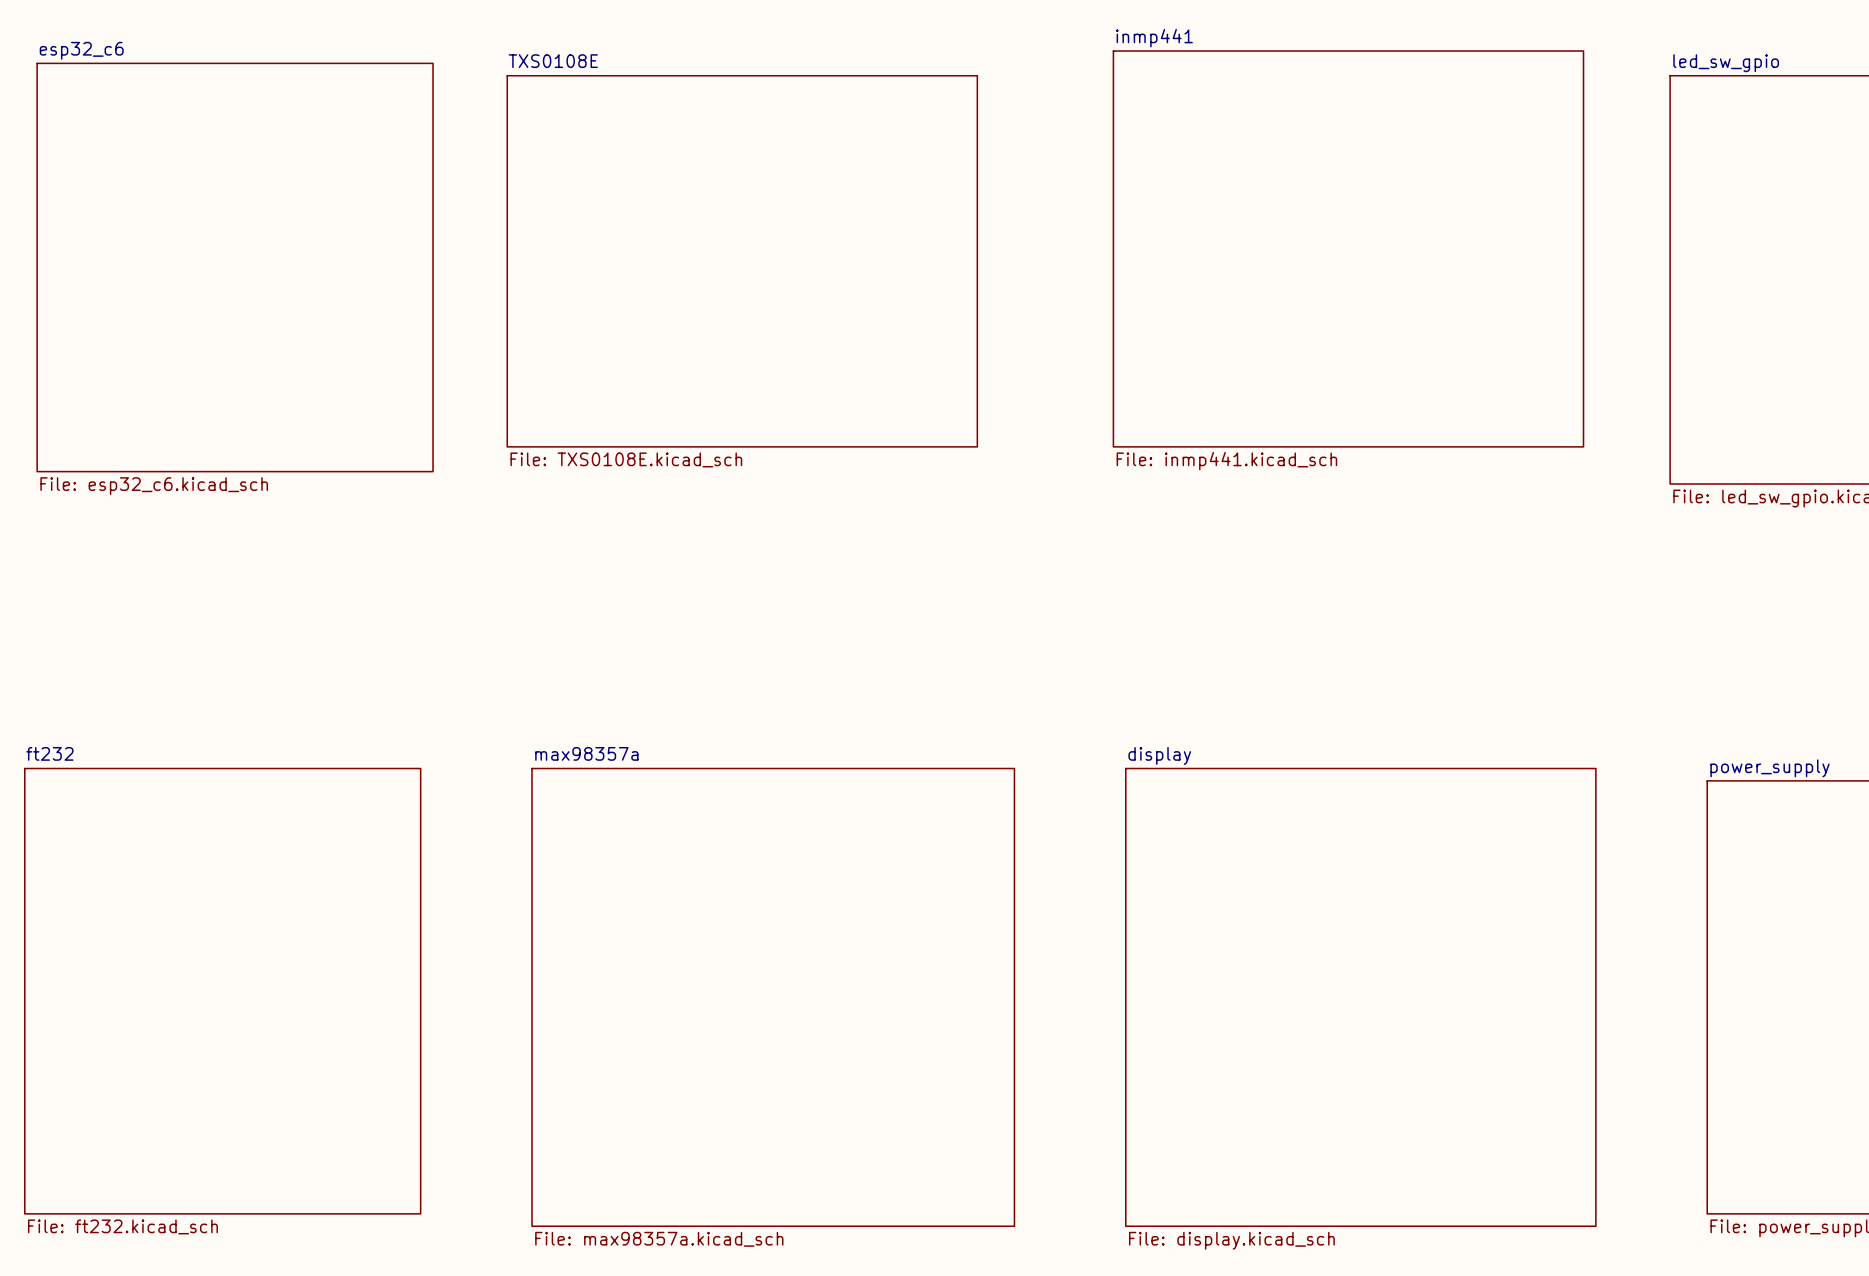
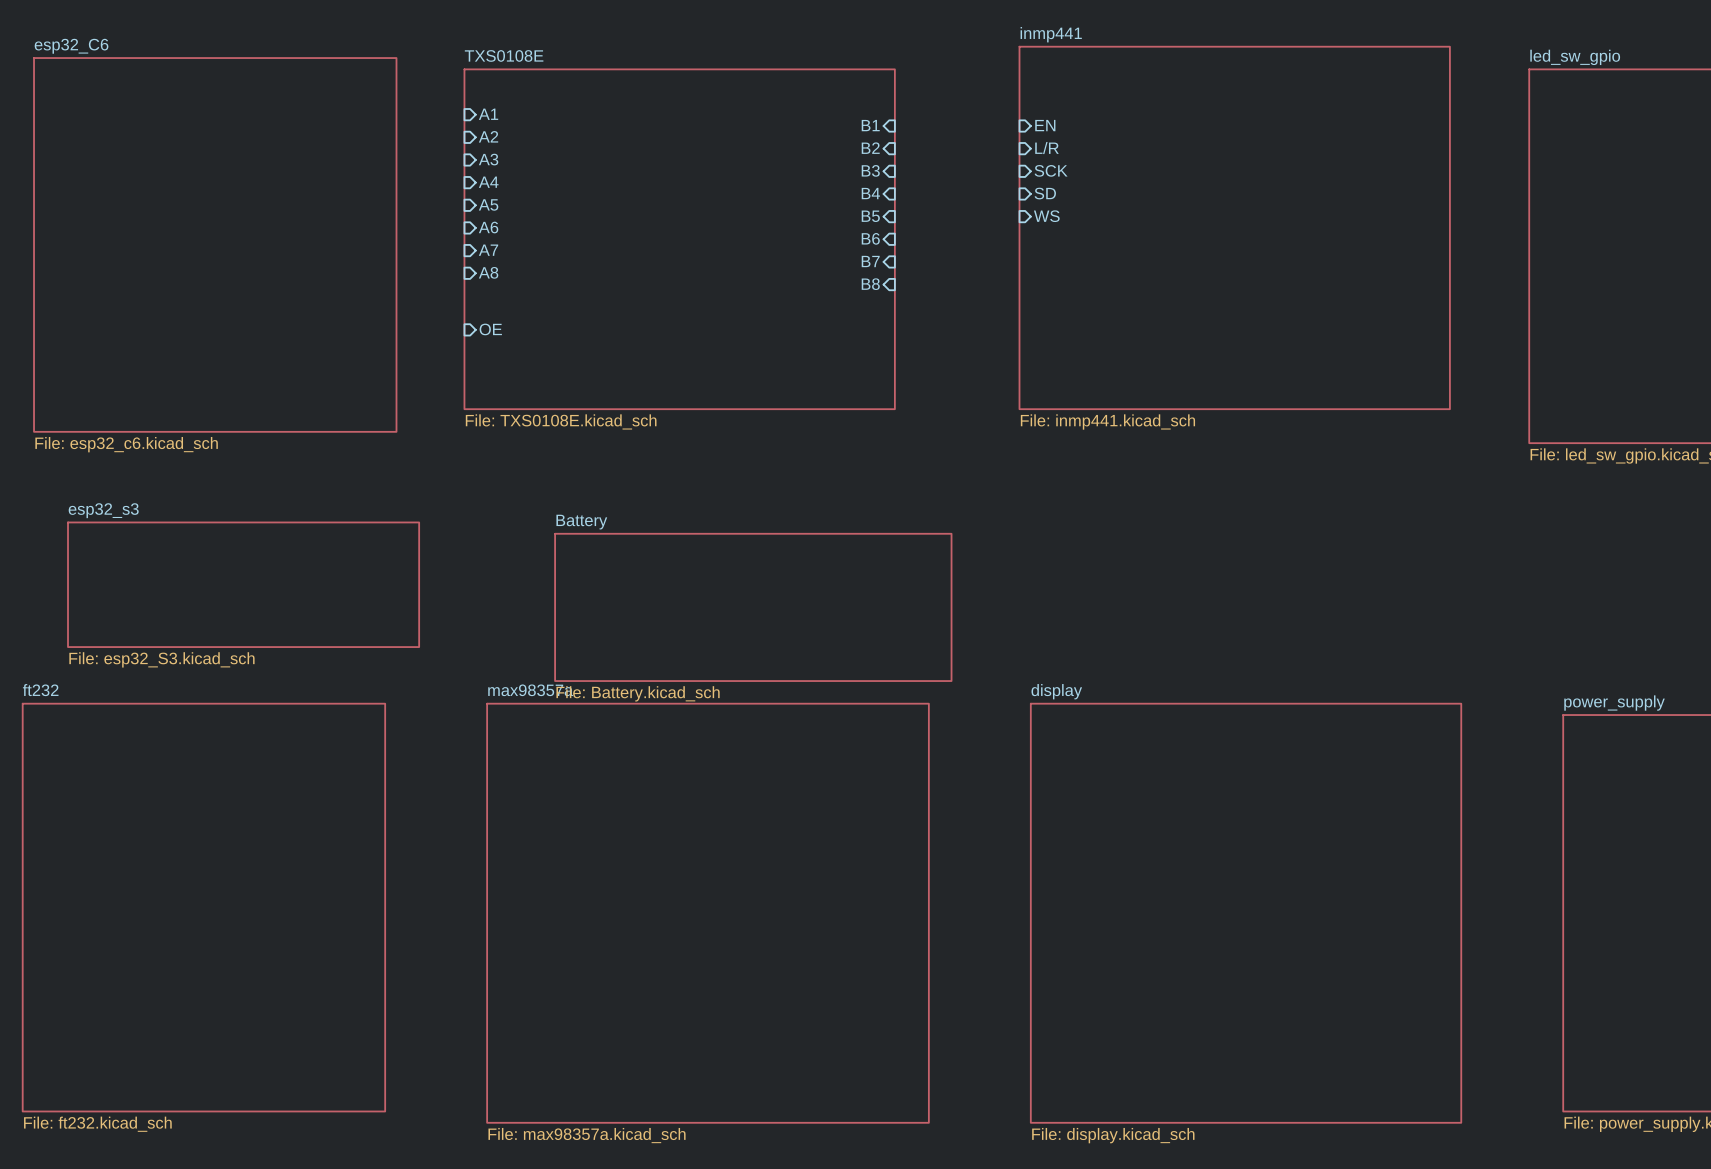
sheet esp32_c6 name: esp32_c6 (81, 50) -> esp32_C6 (71, 46)
sheet pin: none -> A1 (488, 114)
sheet pin: none -> B1 (870, 125)
sheet pin: none -> EN (1045, 125)
sheet pin: none -> A2 (488, 136)
sheet pin: none -> B2 (870, 148)
sheet pin: none -> L/R (1046, 148)
sheet pin: none -> A3 (488, 159)
sheet pin: none -> B3 (870, 170)
sheet pin: none -> SCK (1051, 170)
sheet pin: none -> A4 (488, 182)
sheet pin: none -> B4 (870, 193)
sheet pin: none -> SD (1045, 193)
sheet pin: none -> A5 (488, 204)
sheet pin: none -> B5 (870, 216)
sheet pin: none -> WS (1046, 216)
sheet pin: none -> A6 (488, 227)
sheet pin: none -> B6 (870, 238)
sheet pin: none -> A7 (488, 250)
sheet pin: none -> B7 (870, 261)
sheet pin: none -> A8 (488, 272)
sheet pin: none -> B8 (870, 284)
sheet pin: none -> OE (490, 329)
sheet esp32_s3: none -> File: esp32_S3.kicad_sch (243, 584)
sheet Battery: none -> File: Battery.kicad_sch (753, 607)

